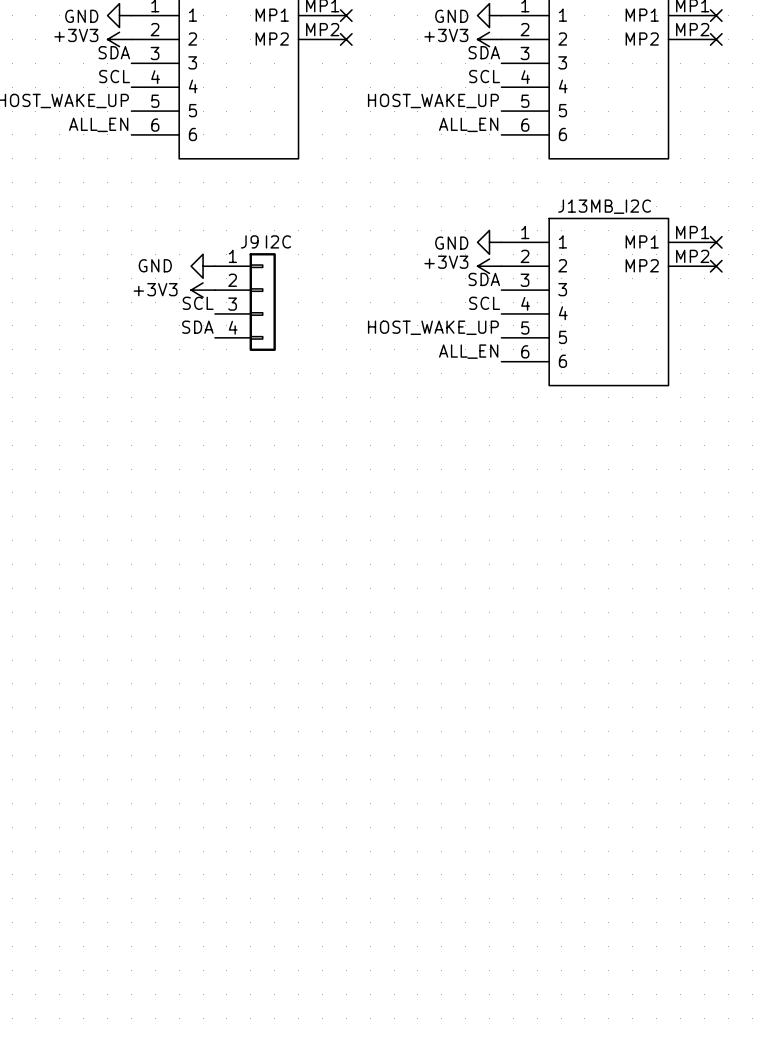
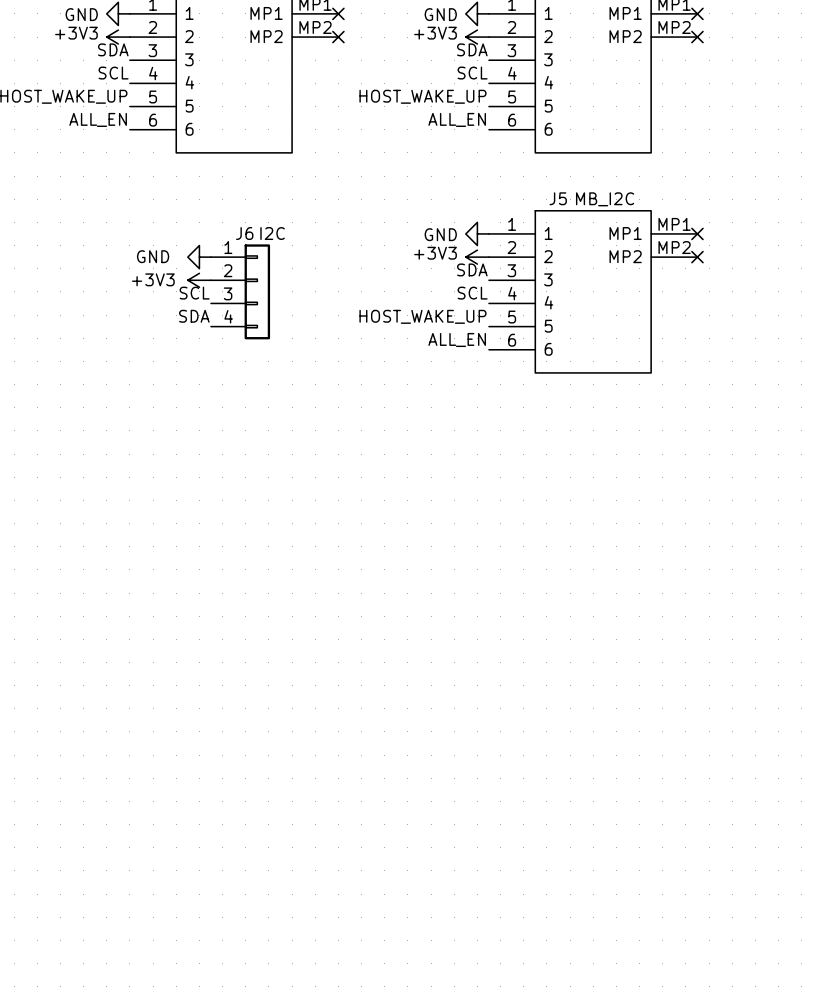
J13 name: J13 (572, 206) -> J5 (558, 198)
J9 name: J9 (249, 241) -> J6 (244, 233)

